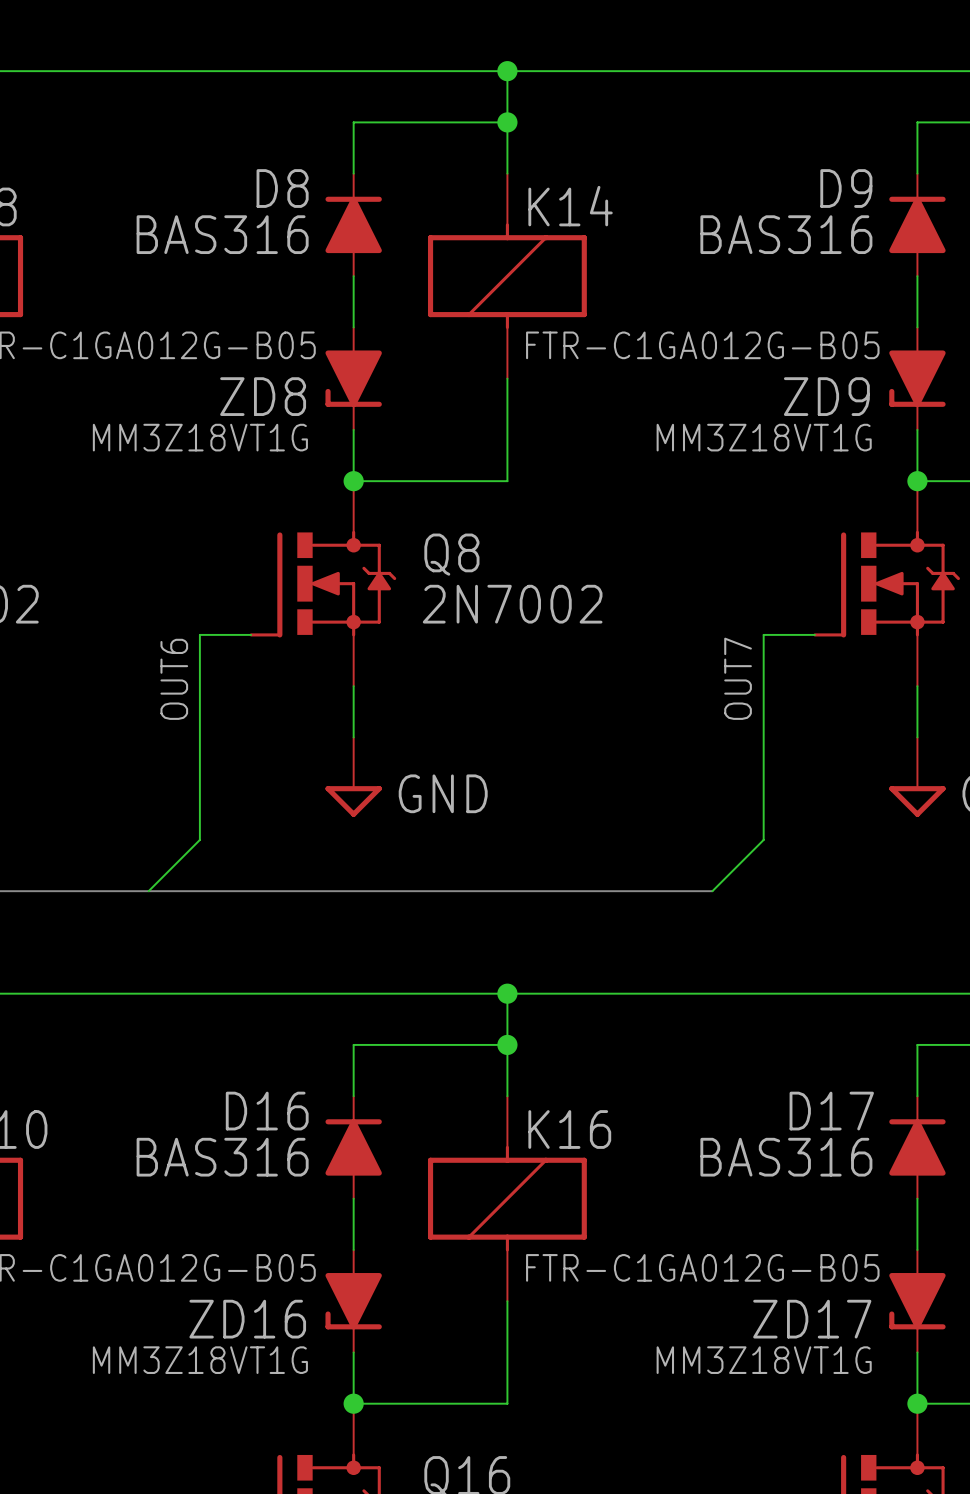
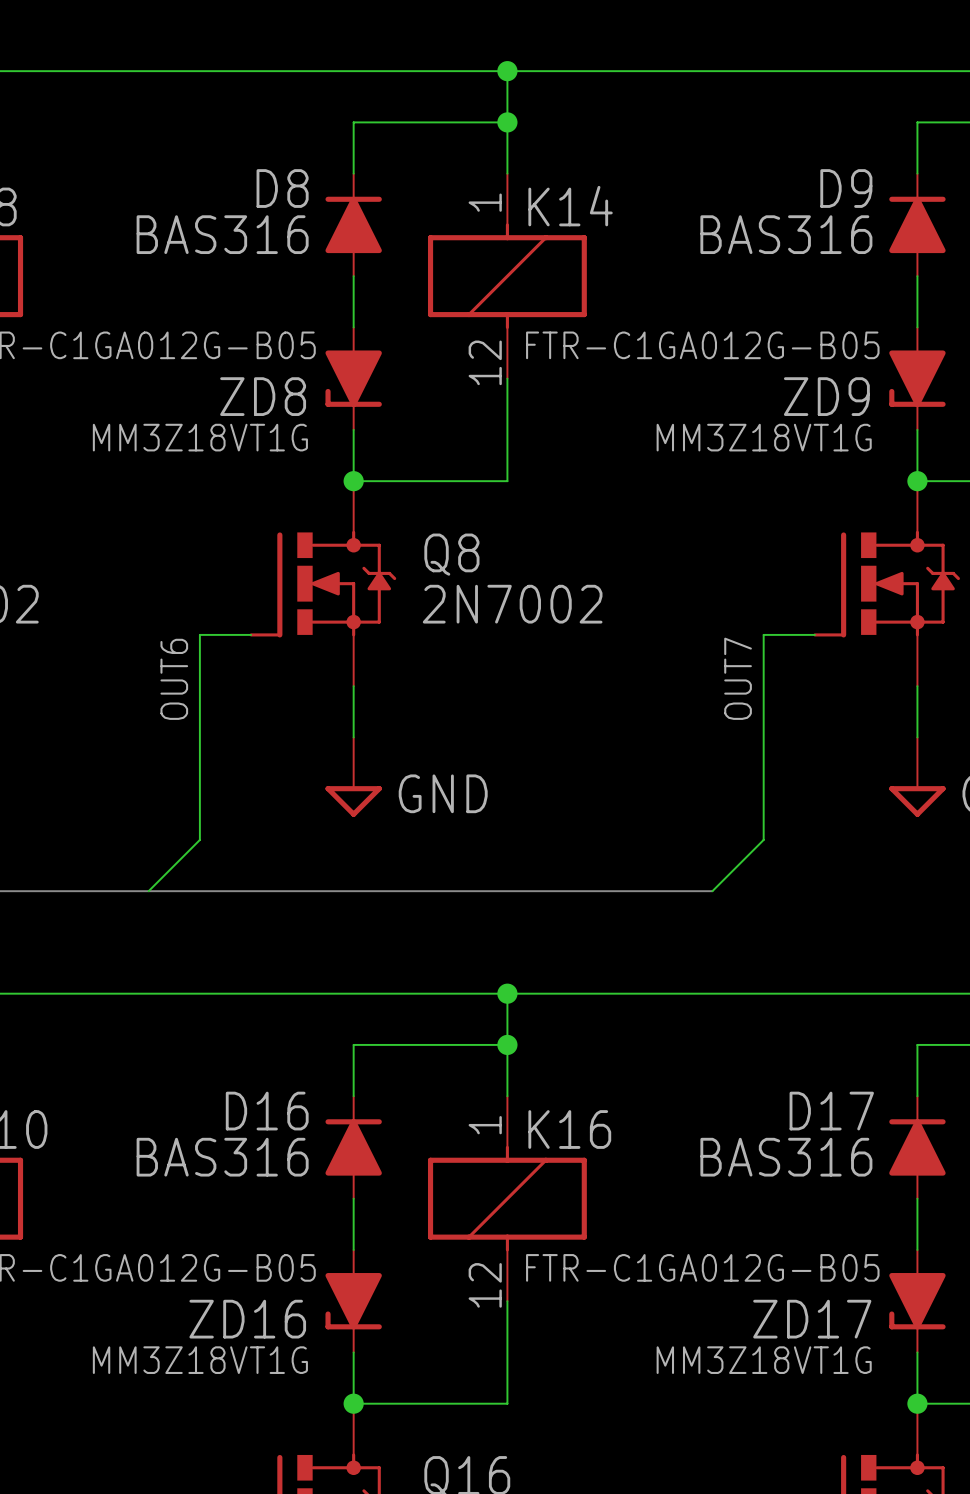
K14 pin number: none -> 1 (485, 202)
K14 pin number: none -> 12 (485, 362)
K16 pin number: none -> 1 (485, 1125)
K16 pin number: none -> 12 (485, 1285)

